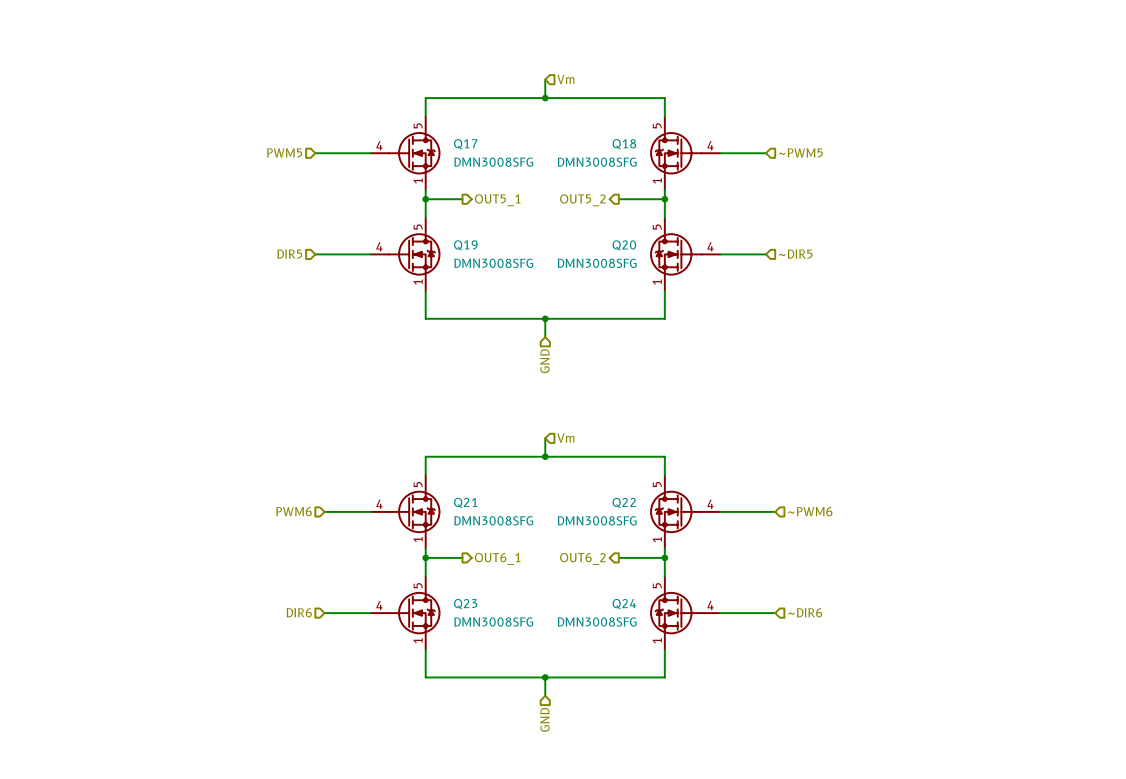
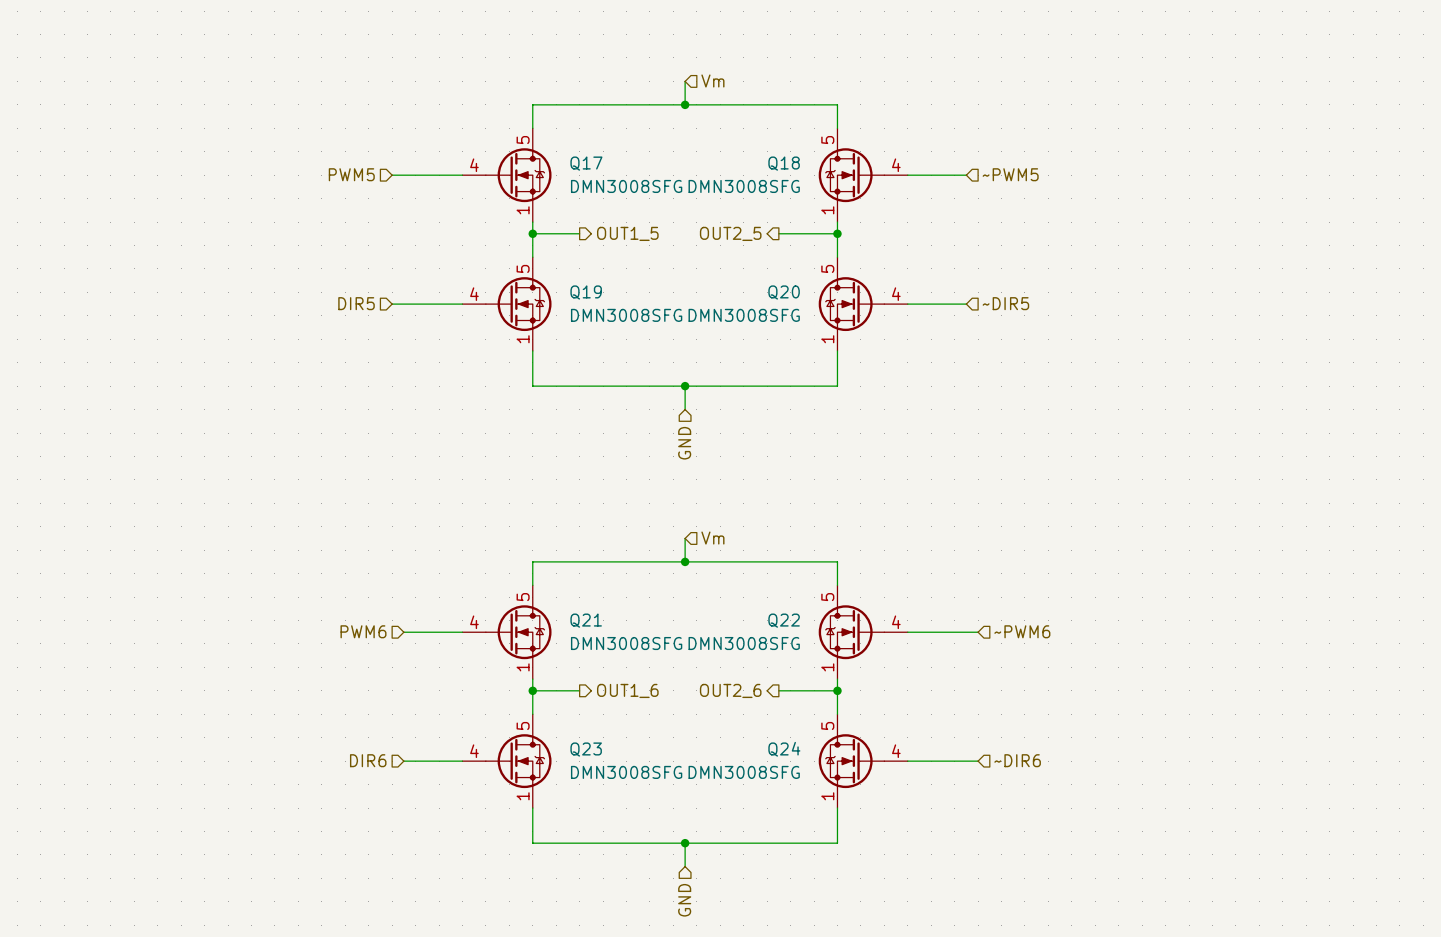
hierarchical label: OUT5_1 (497, 200) -> OUT1_5 (627, 233)
hierarchical label: OUT5_2 (582, 200) -> OUT2_5 (730, 233)
hierarchical label: OUT6_1 (497, 558) -> OUT1_6 (627, 690)
hierarchical label: OUT6_2 (582, 558) -> OUT2_6 (730, 690)

